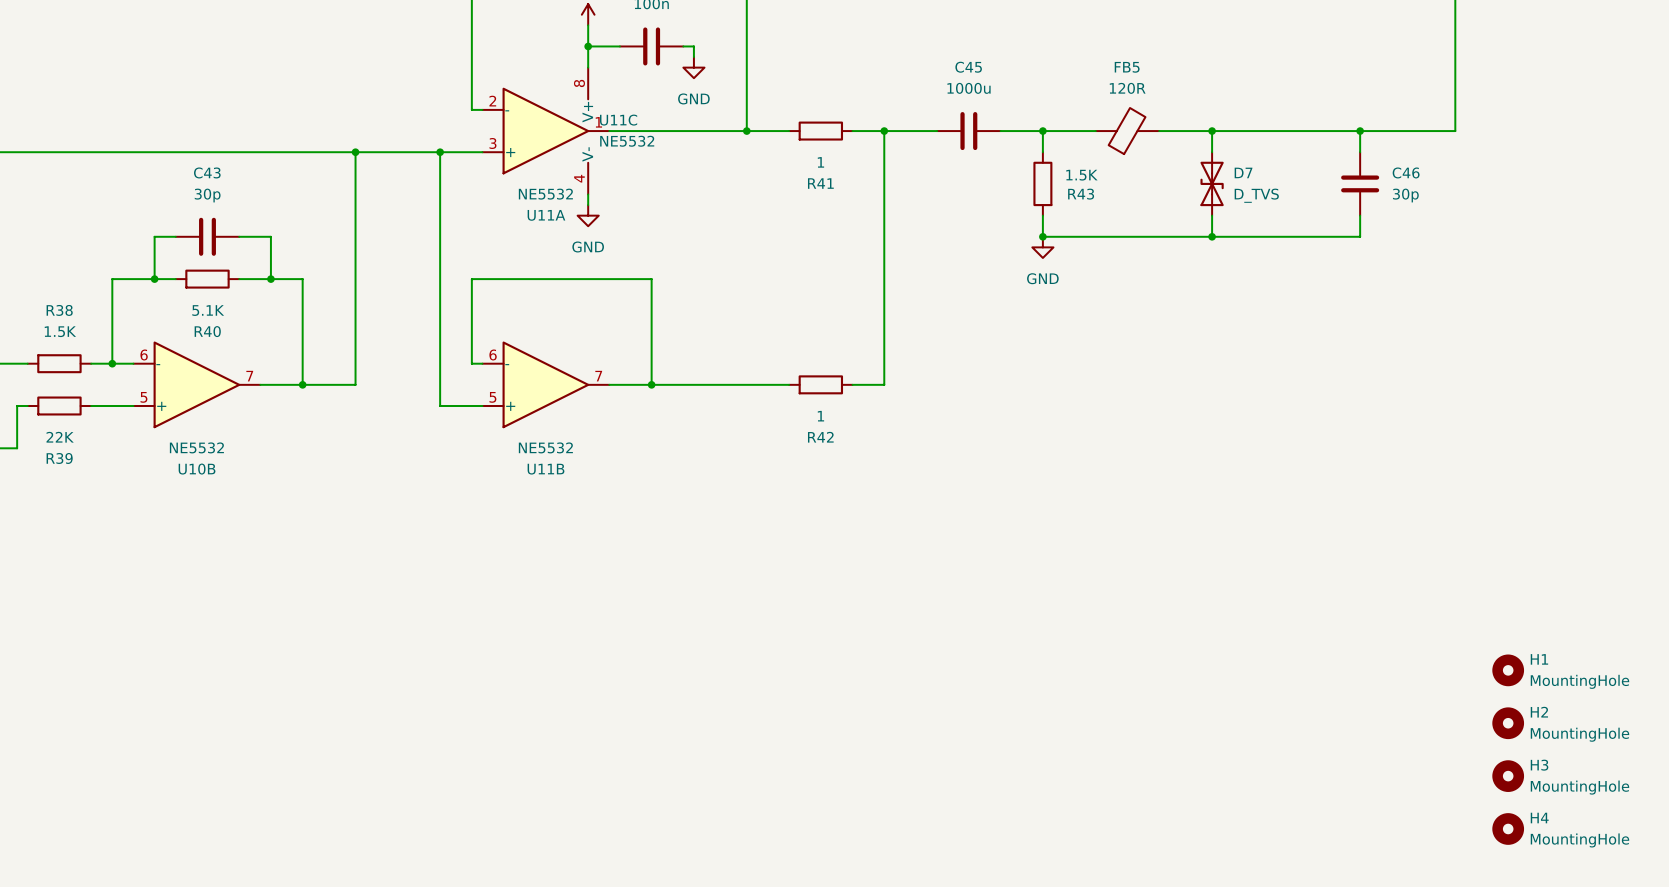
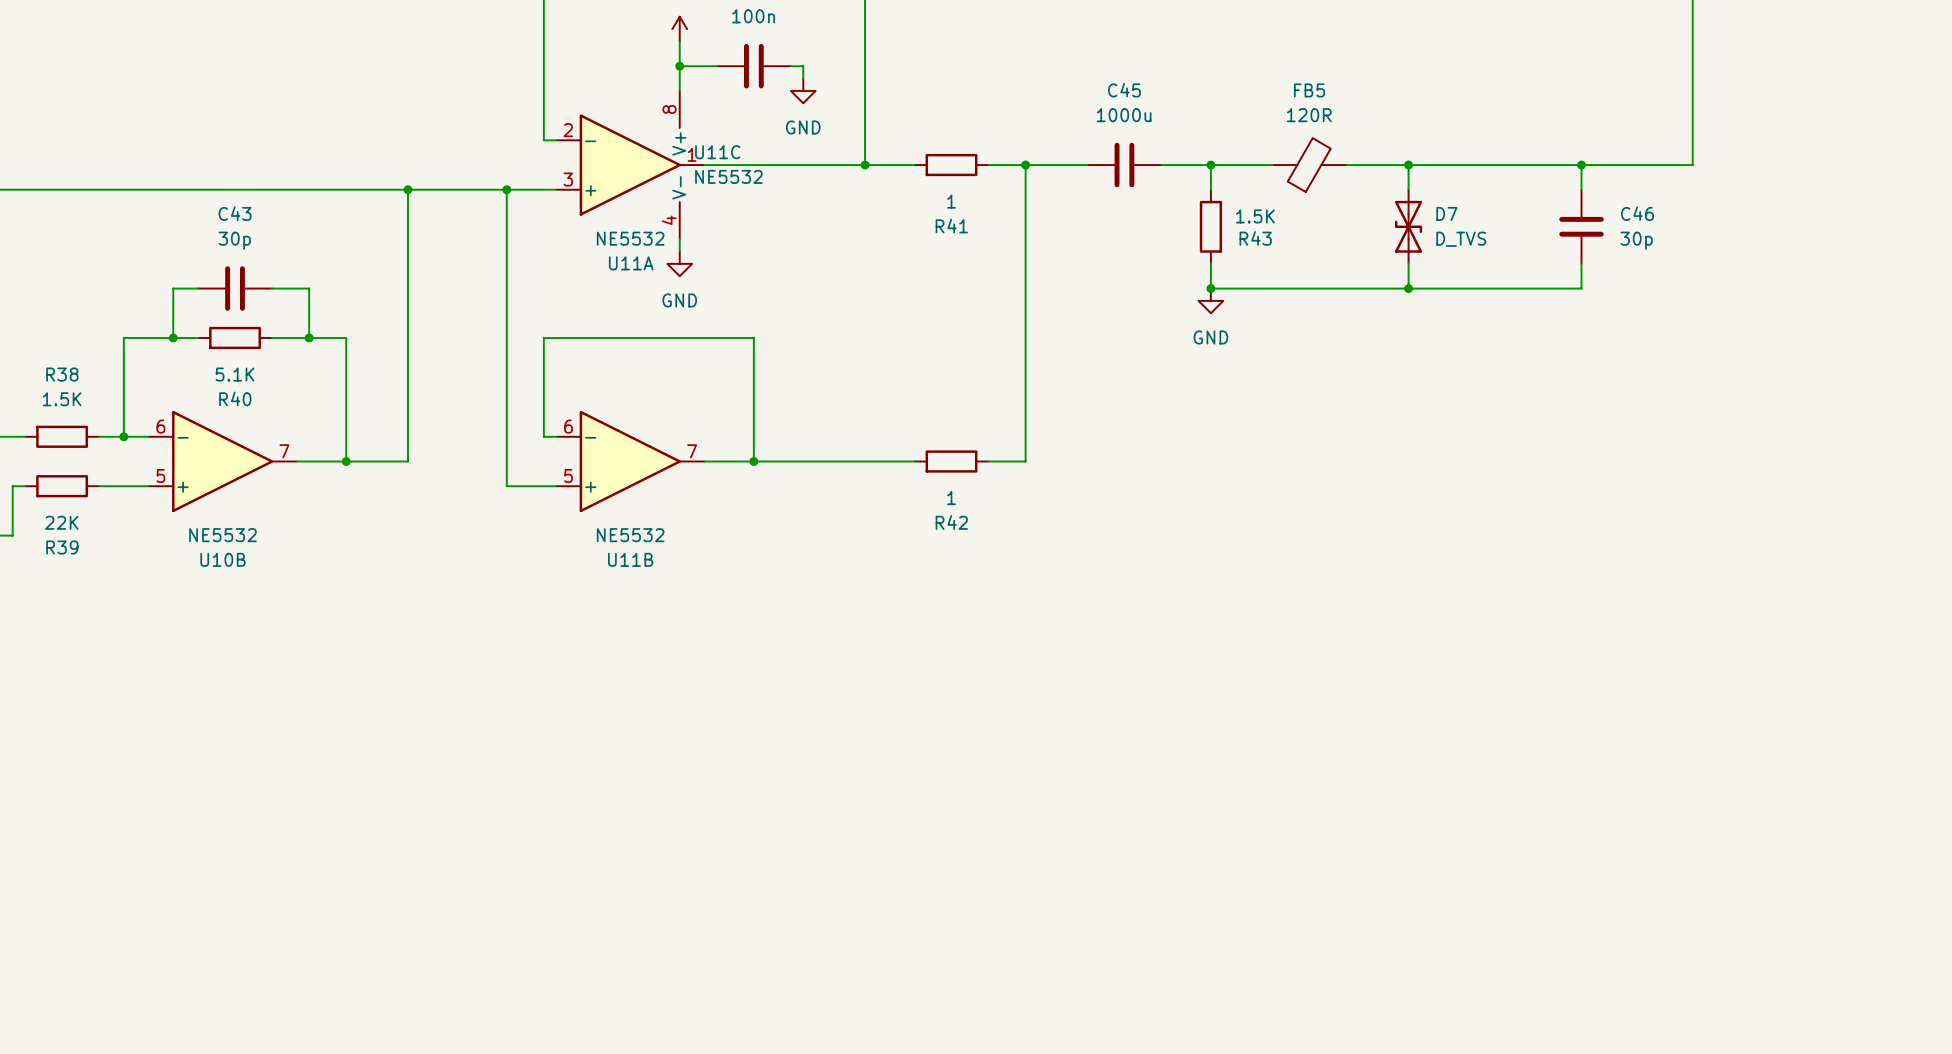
H1: MountingHole (1508, 670) -> none
H2: MountingHole (1508, 723) -> none
H3: MountingHole (1508, 776) -> none
H4: MountingHole (1508, 828) -> none

